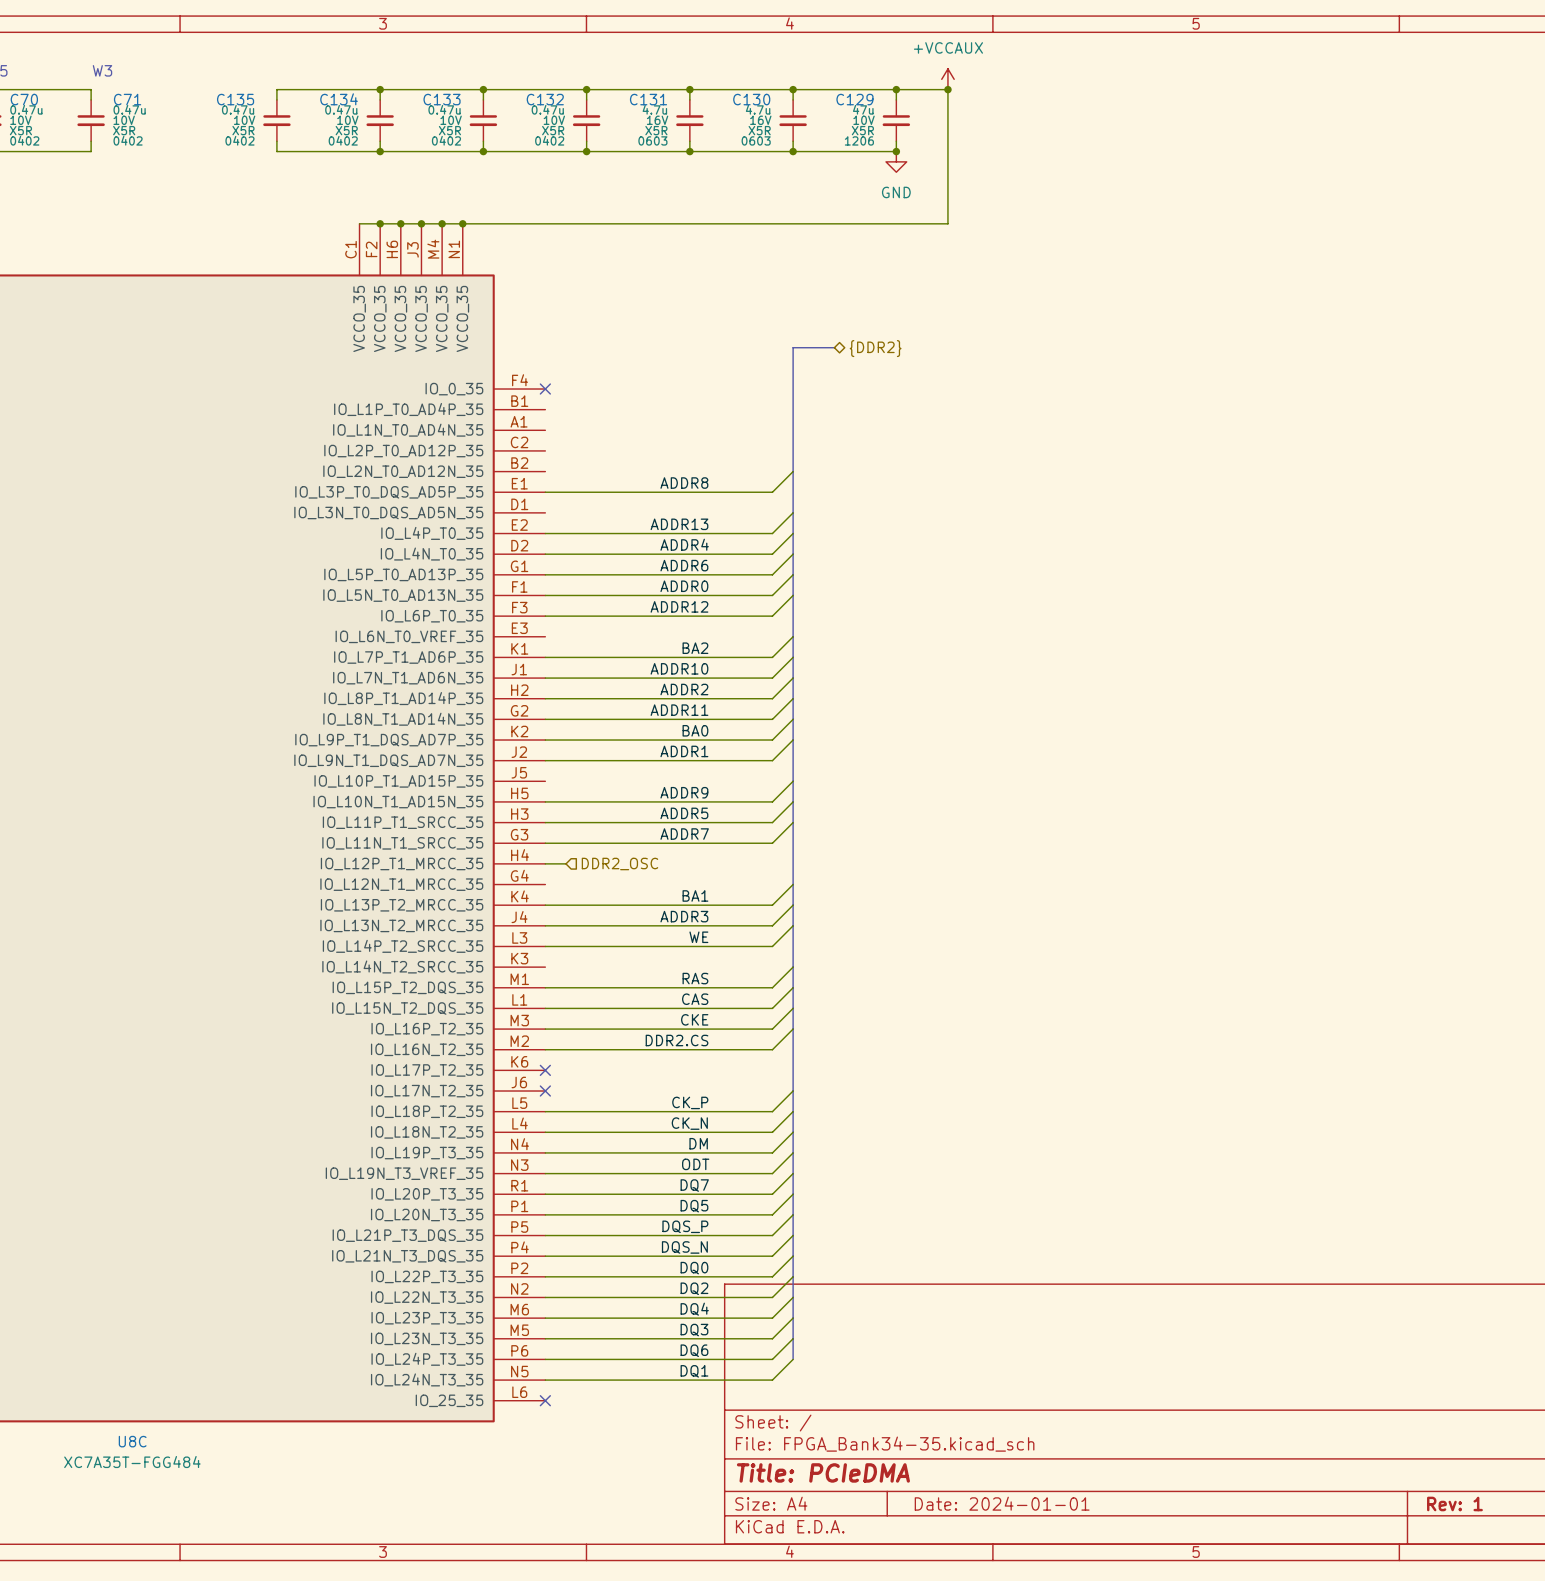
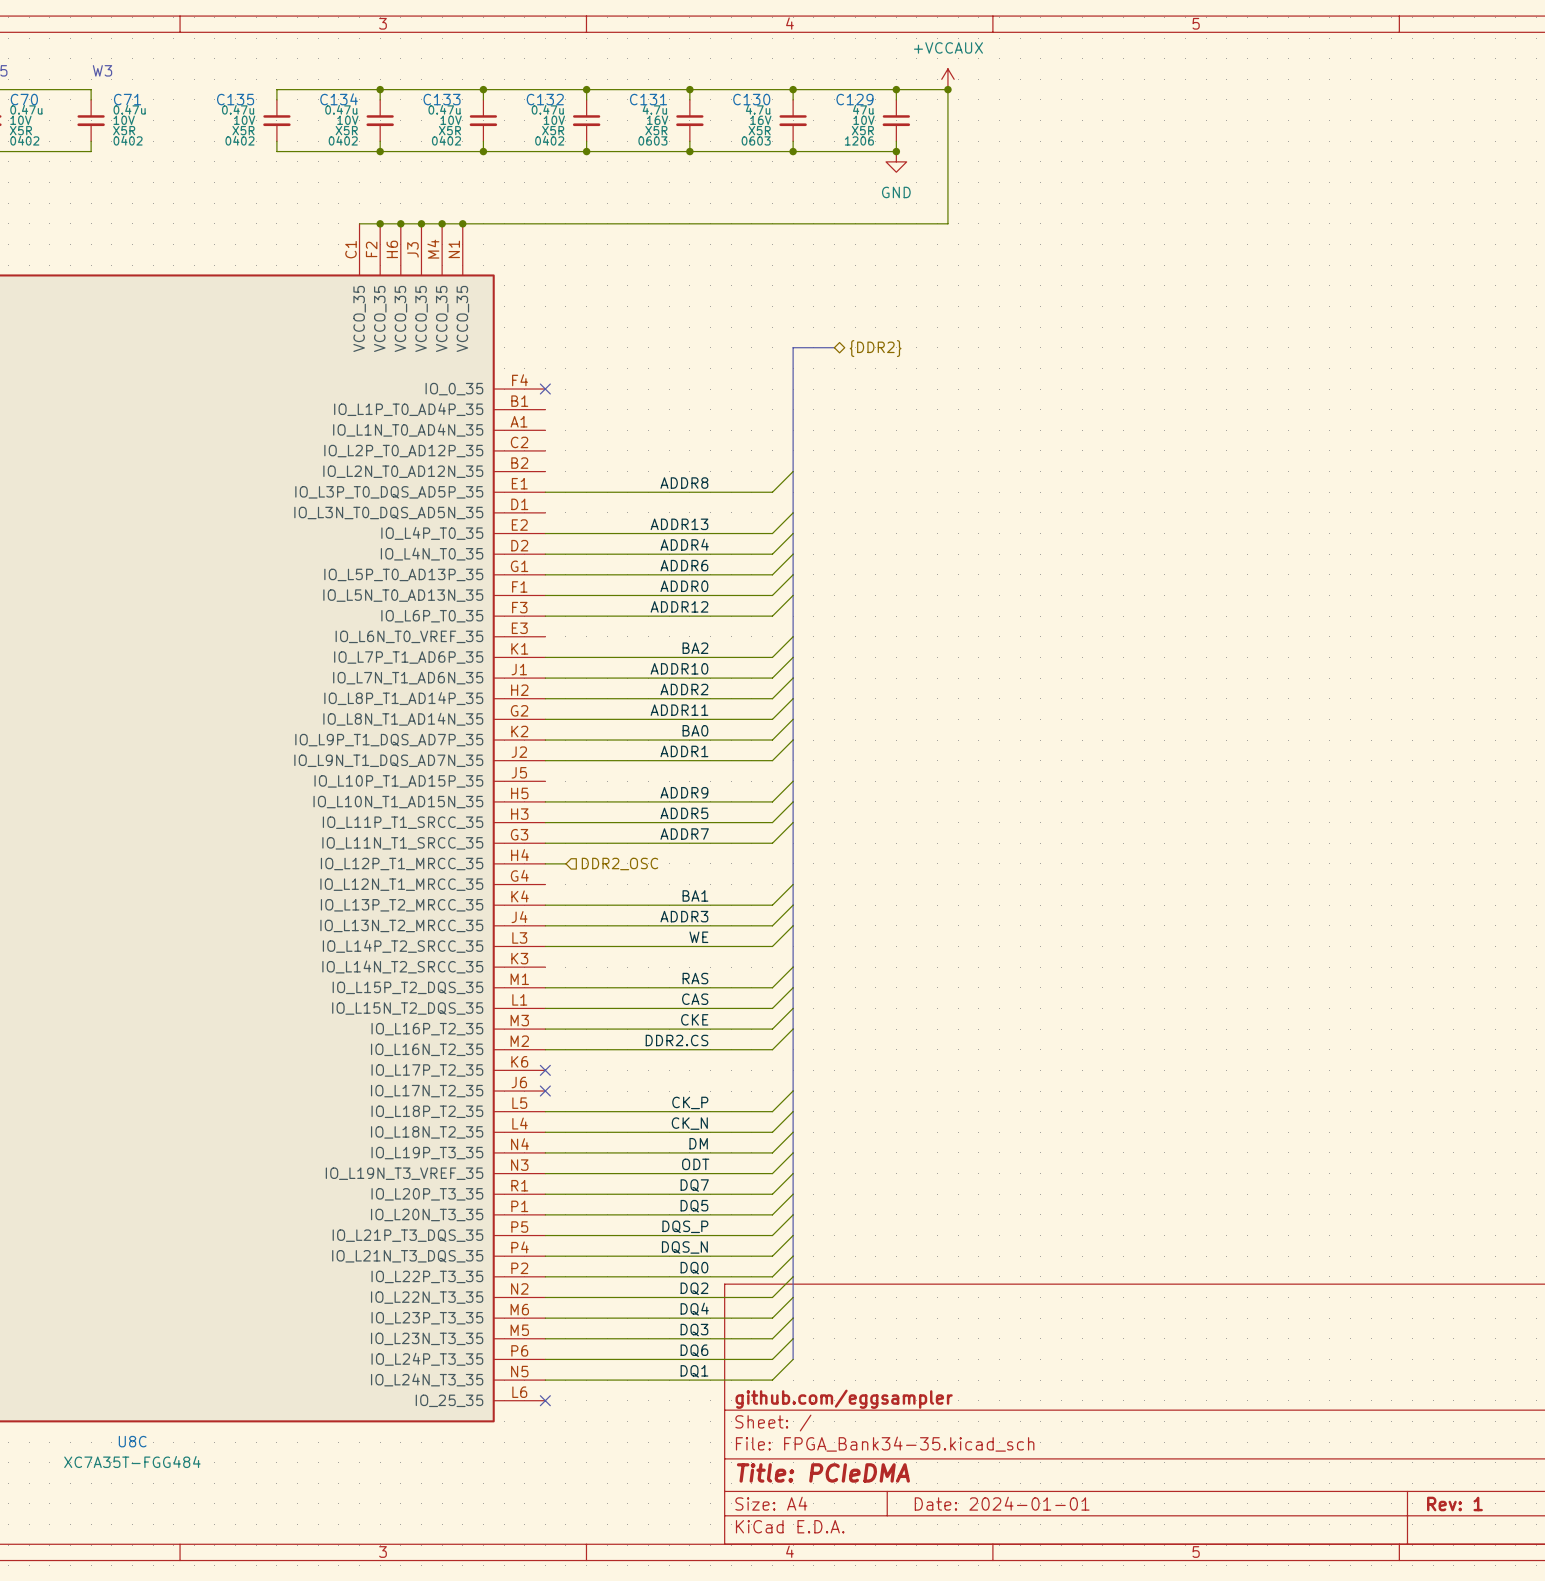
title block: none -> github.com/eggsampler (844, 1399)

